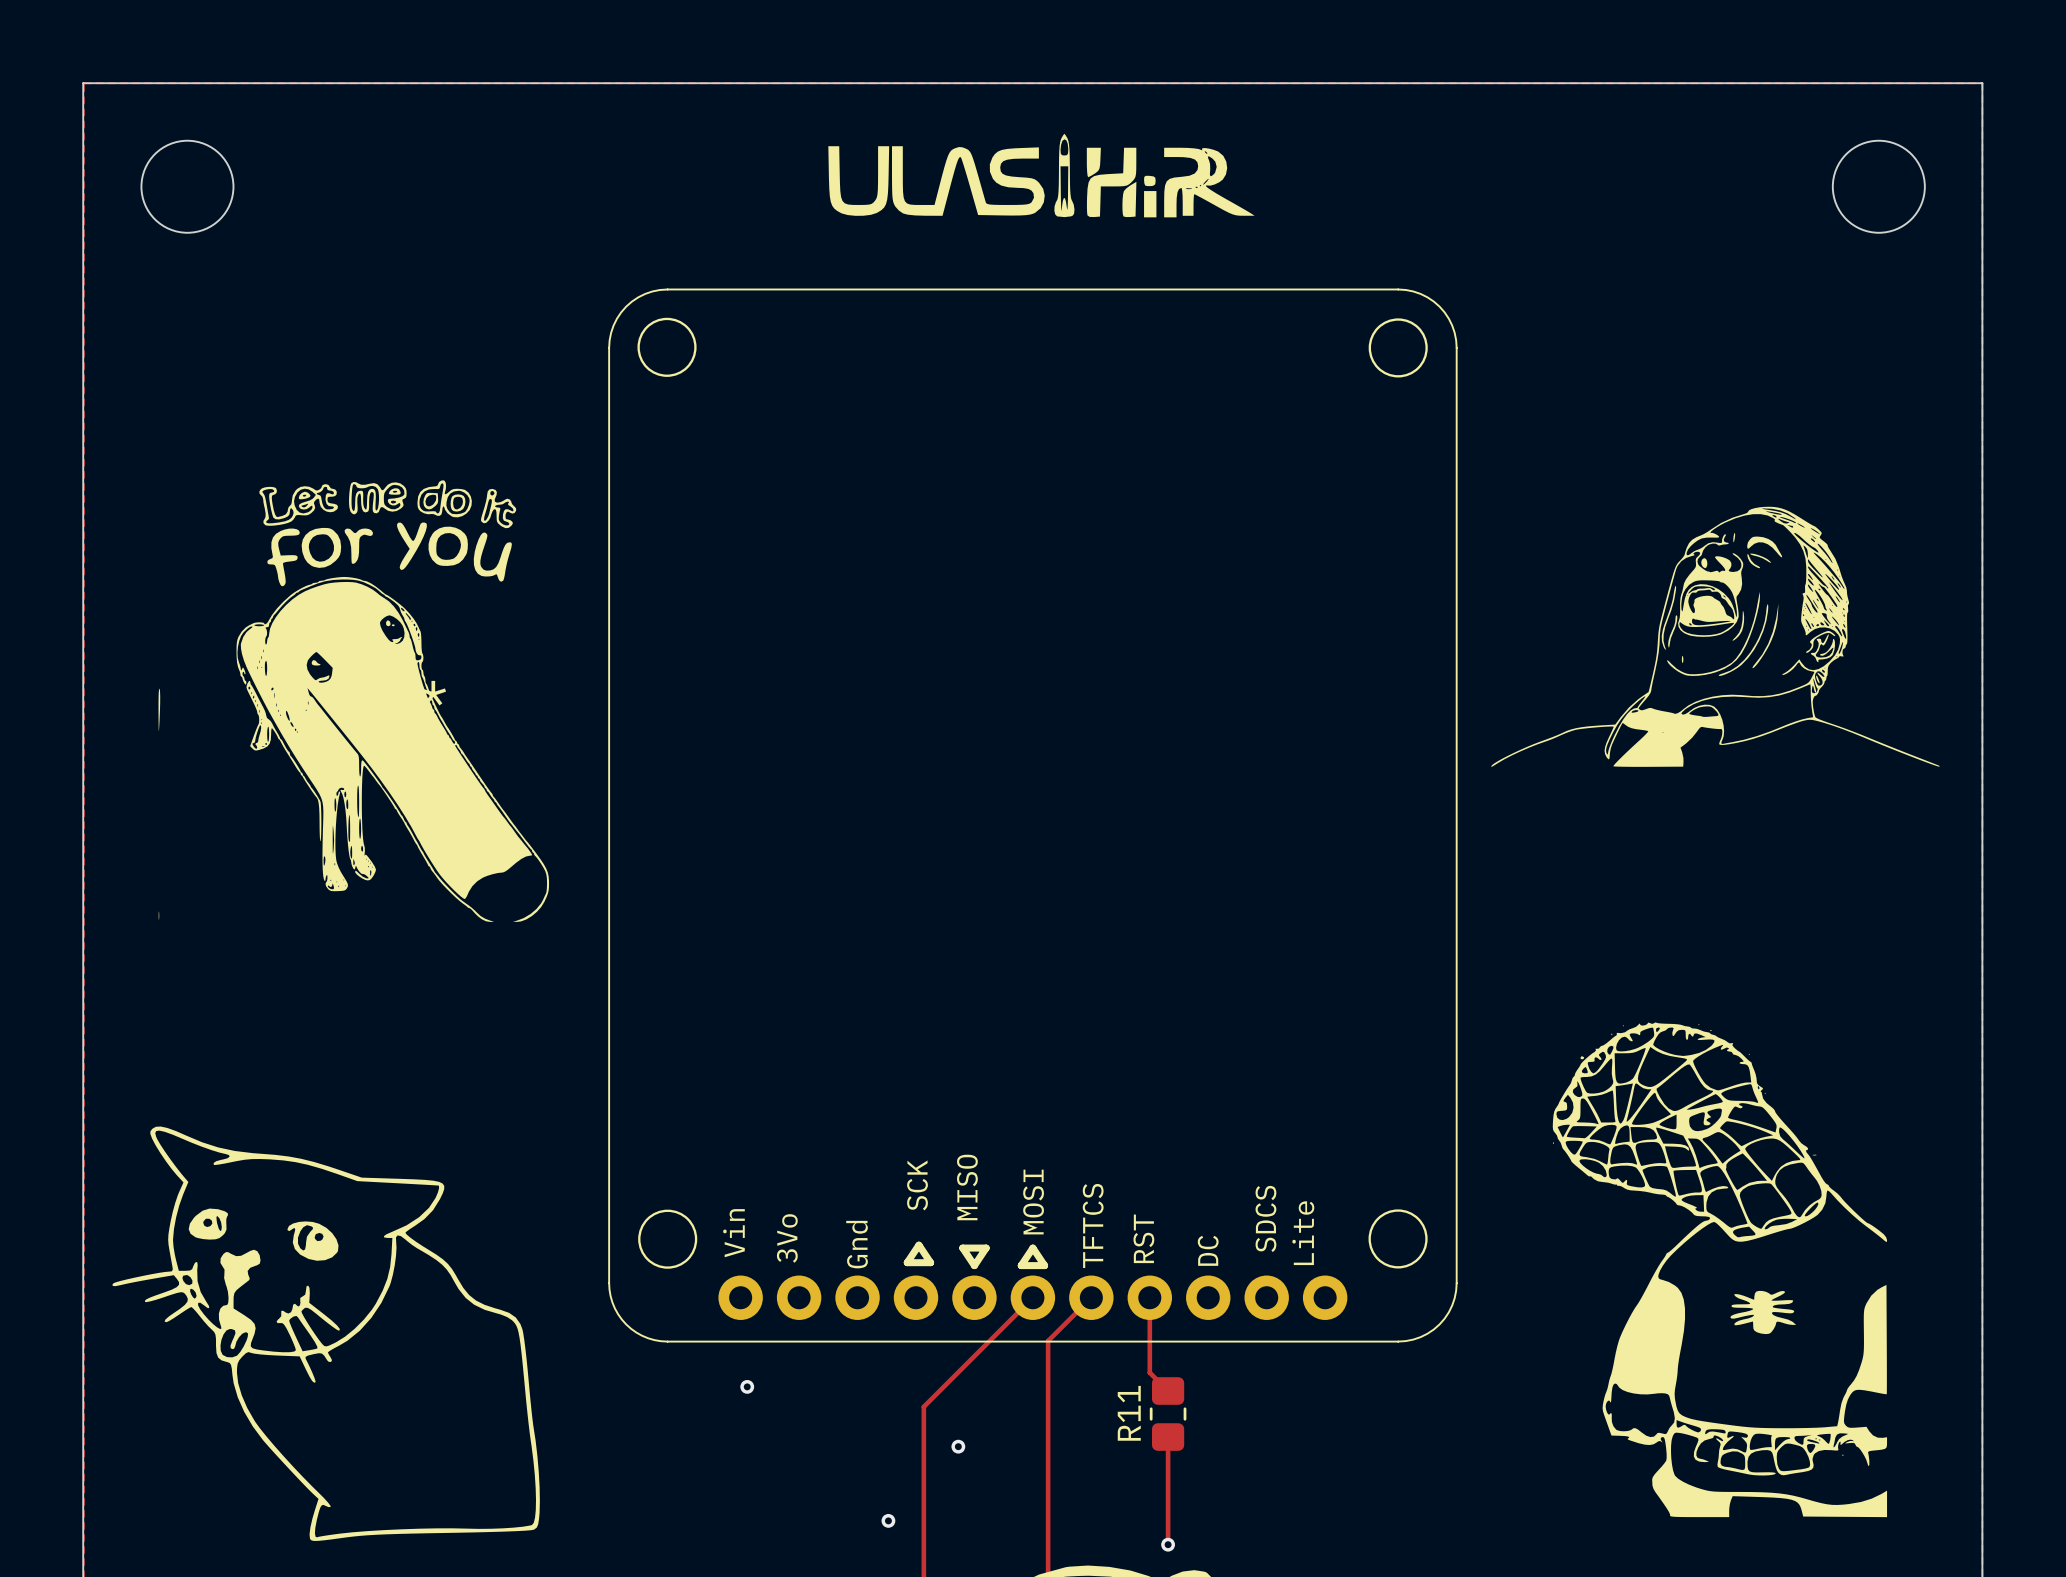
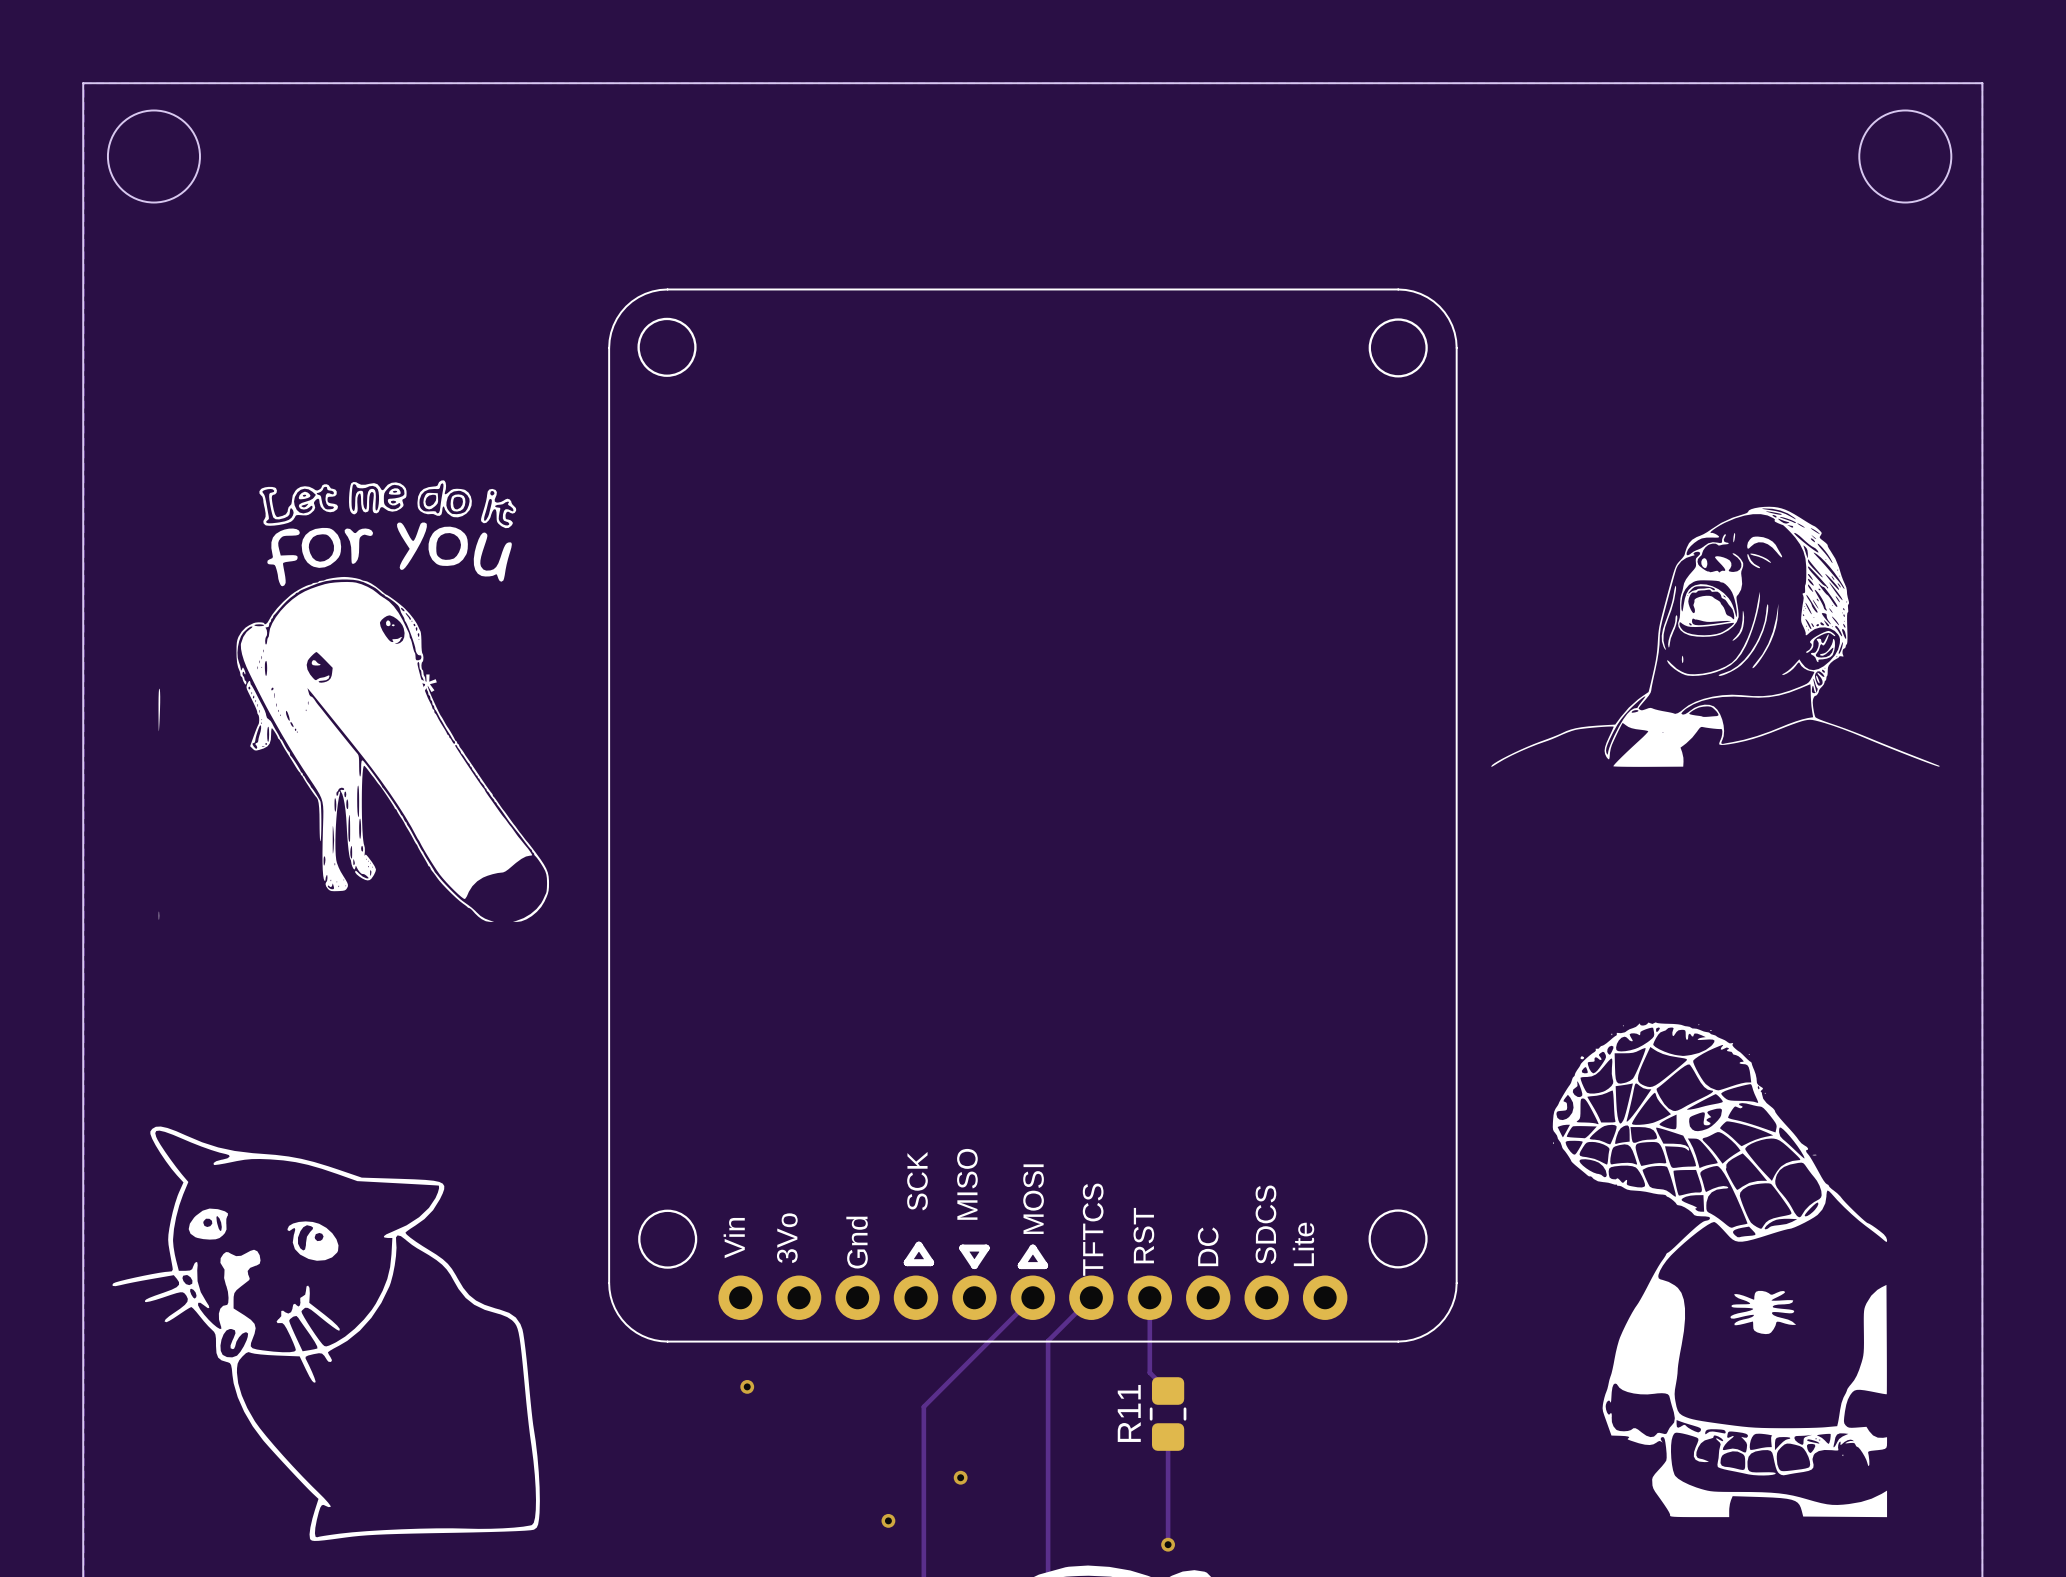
drawing: [828, 133, 1255, 218] -> none
round board edge position: (187, 186) -> (153, 156)
round board edge position: (1878, 186) -> (1905, 156)
via position: (958, 1446) -> (960, 1477)

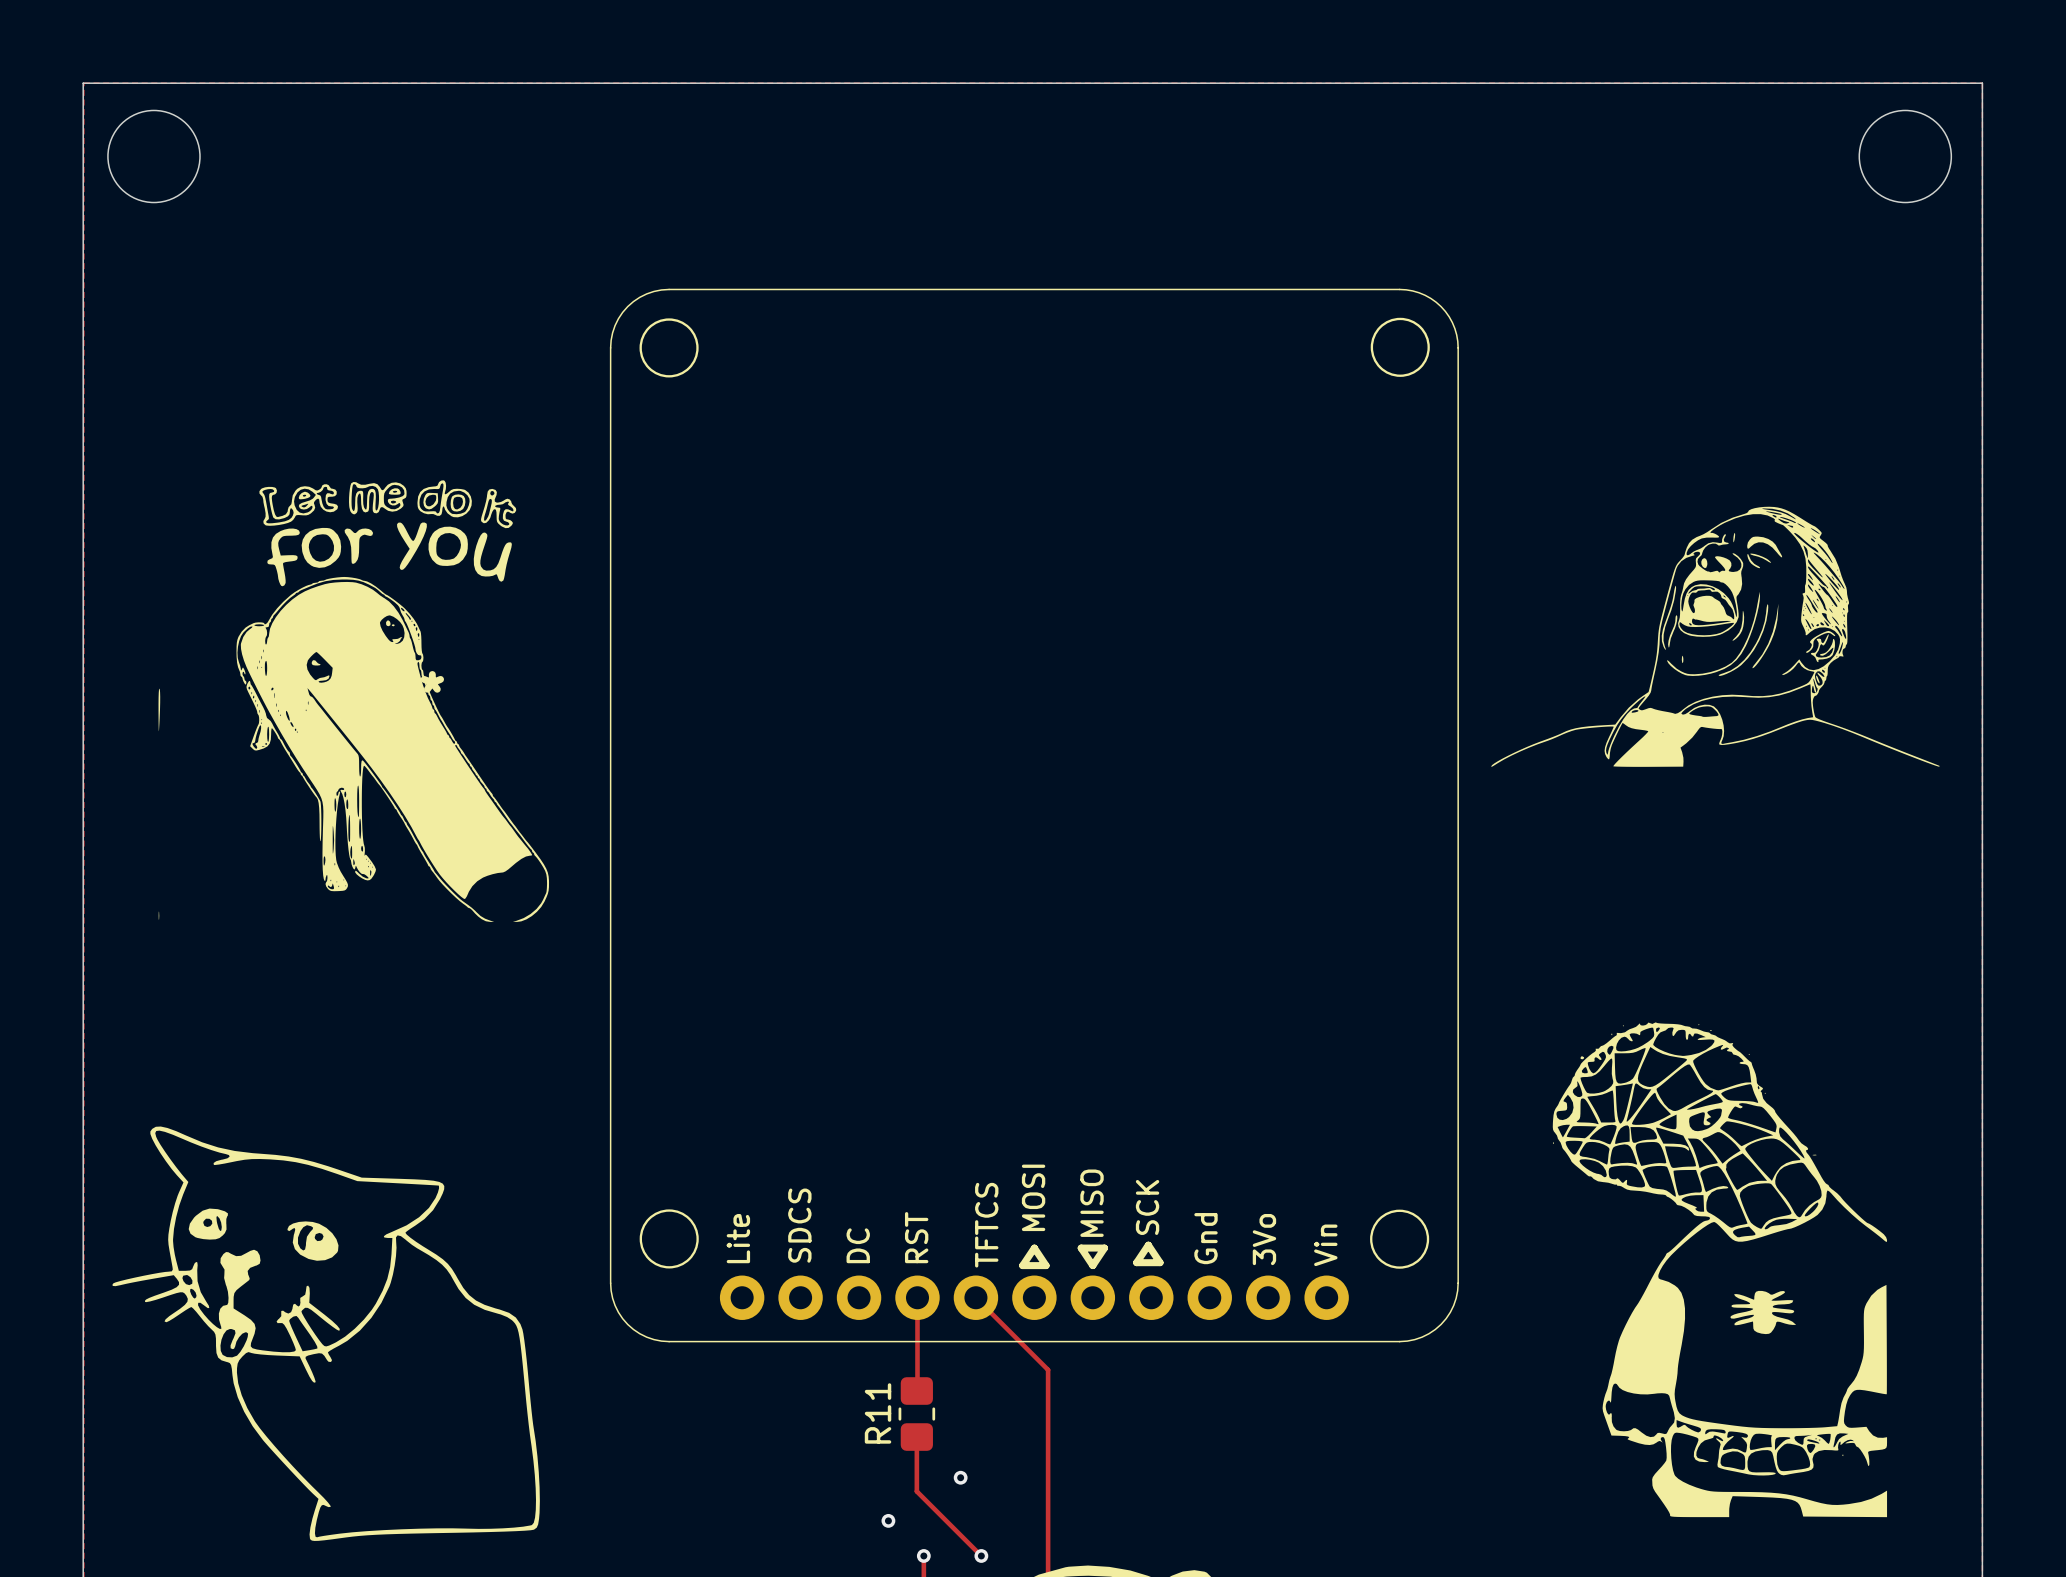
part footprint: [608, 288, 1458, 1343] -> [610, 288, 1459, 1343]
text position: SCK (917, 1181) -> SCK (1147, 1207)
text position: MISO (967, 1184) -> MISO (1092, 1203)
text position: TFTCS (1093, 1229) -> TFTCS (986, 1225)
text position: RST (1143, 1235) -> RST (916, 1237)
text: Vin (734, 1238) -> none
text position: 3Vo (787, 1238) -> 3Vo (1264, 1239)
text position: Gnd (857, 1242) -> Gnd (1206, 1238)
text: none -> Vin (1325, 1245)
track: none -> (917, 1297) (916, 1391)
track: (1032, 1297) (923, 1406) (923, 1555) -> none
track: (1091, 1297) (1048, 1341) (1048, 1369) -> (975, 1297) (1048, 1369)
track: (1149, 1297) (1149, 1372) (1168, 1391) -> none
via: (747, 1386) -> none
R11 position: (1168, 1414) -> (916, 1414)
track: none -> (916, 1437) (916, 1491) (981, 1555)
track: (1168, 1437) (1168, 1544) -> none
via: (1168, 1544) -> none
via: none -> (923, 1555)
via: none -> (981, 1555)

